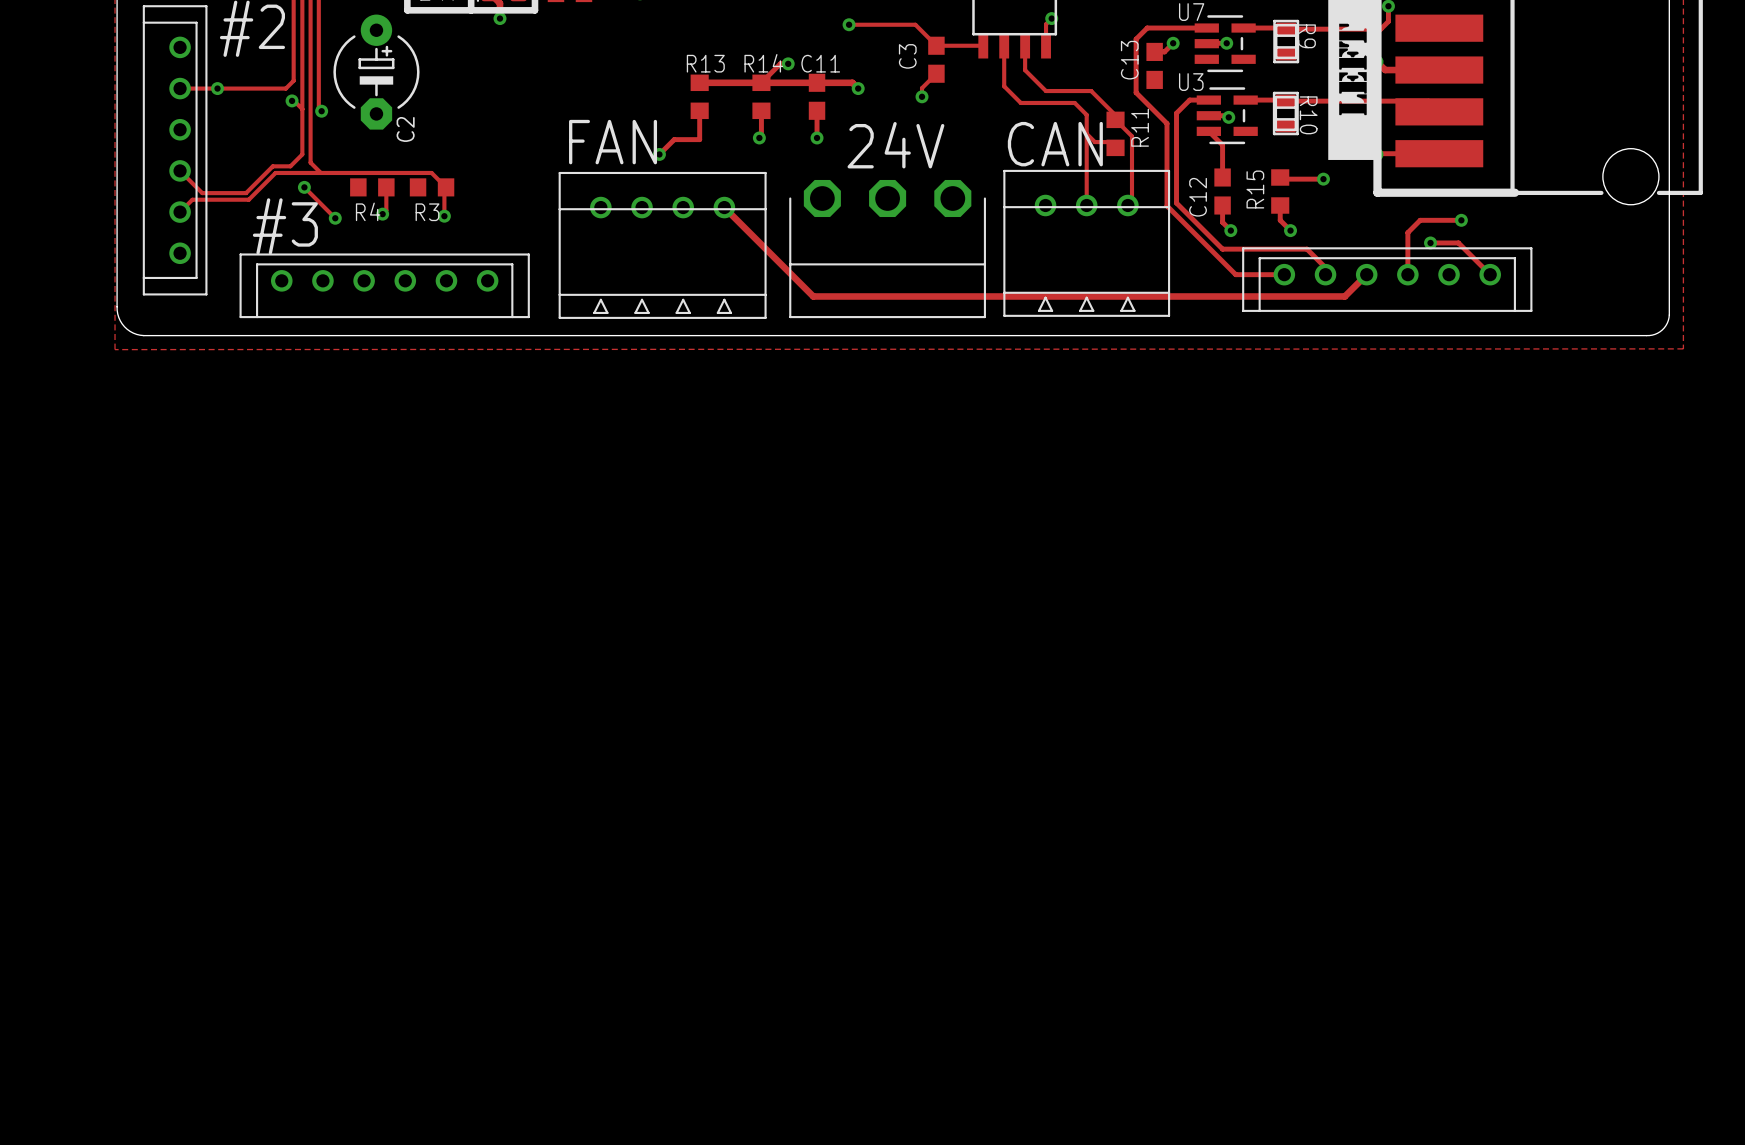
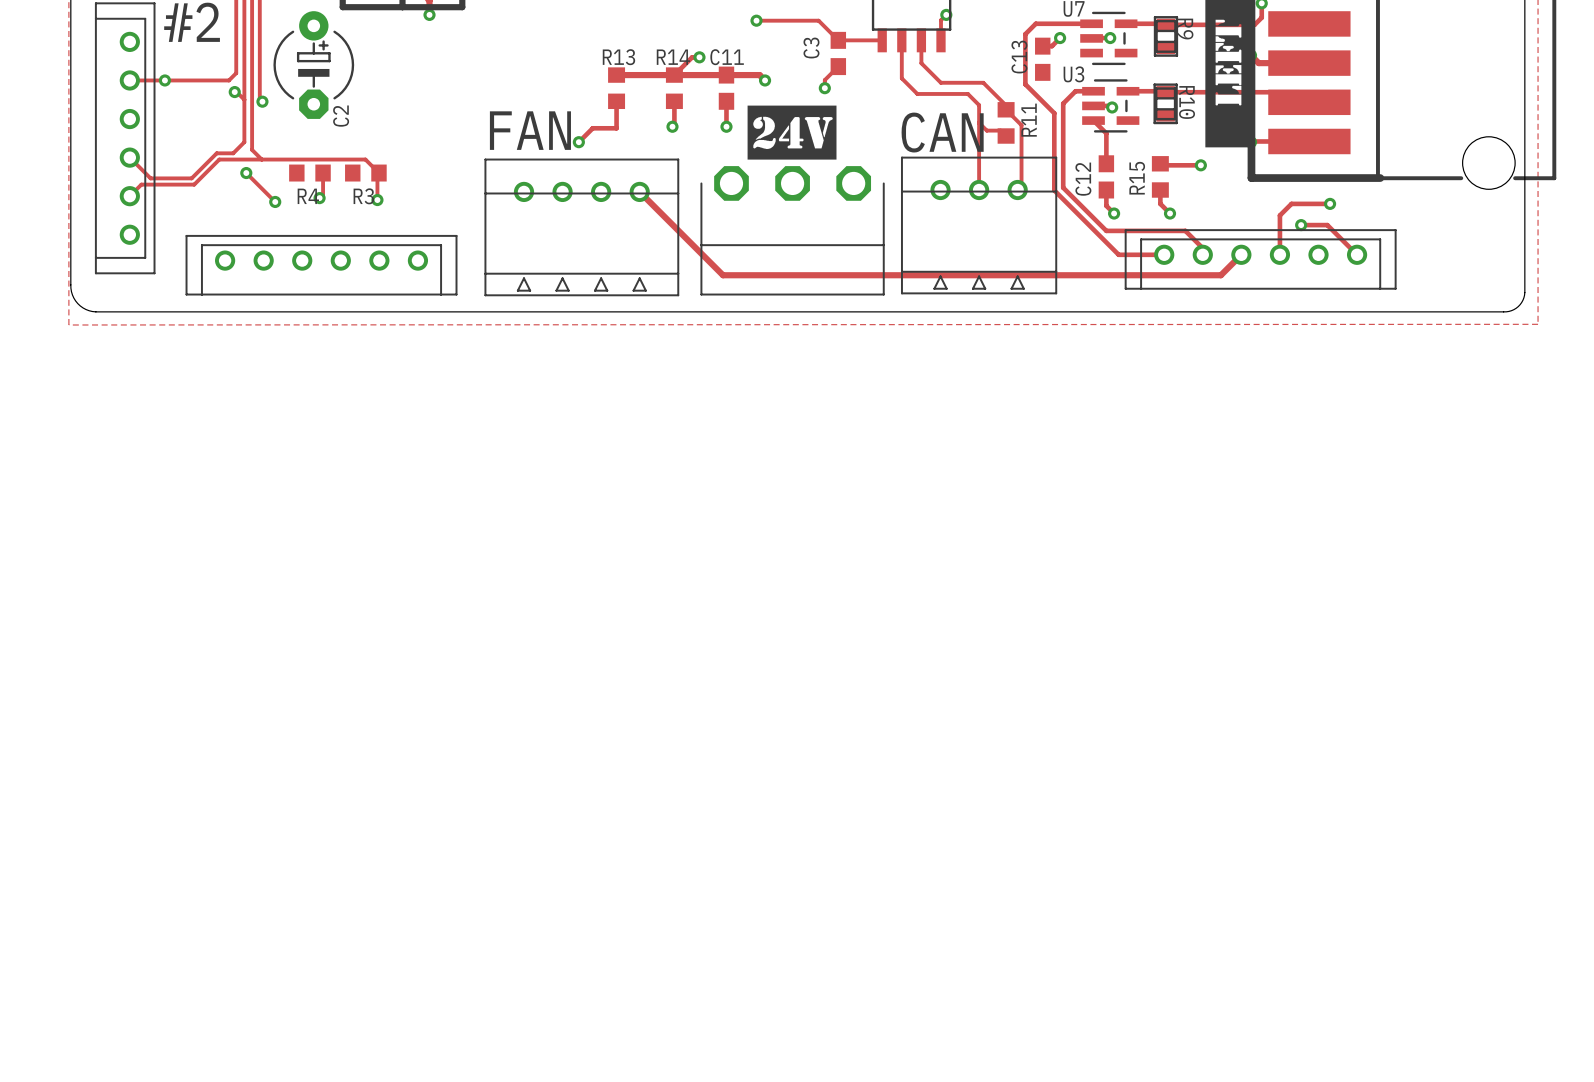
drawing: none -> [747, 105, 837, 160]
text: 24V (895, 145) -> none
text: #3 (285, 226) -> none

